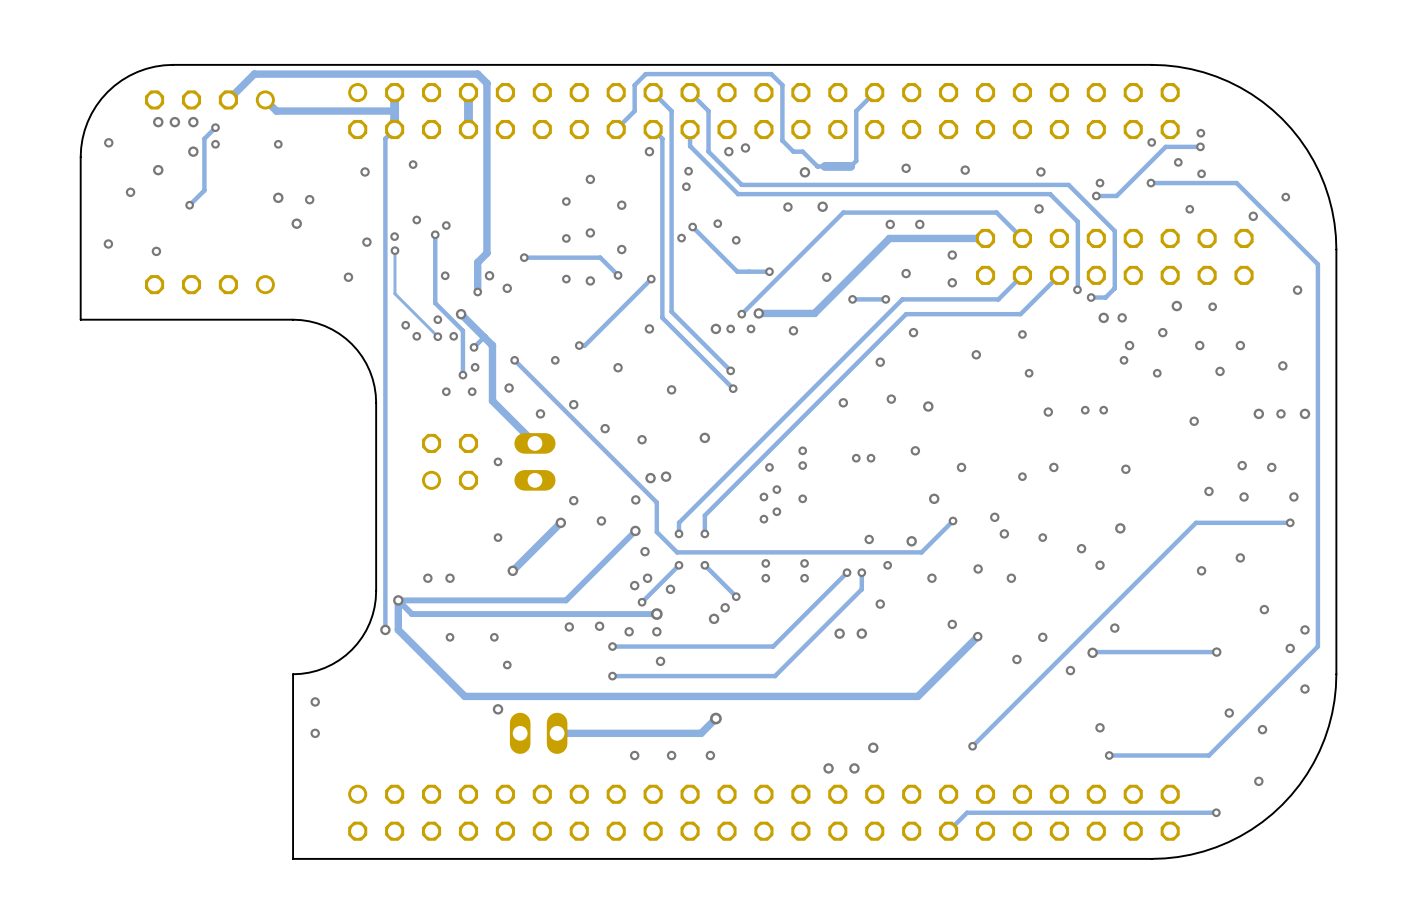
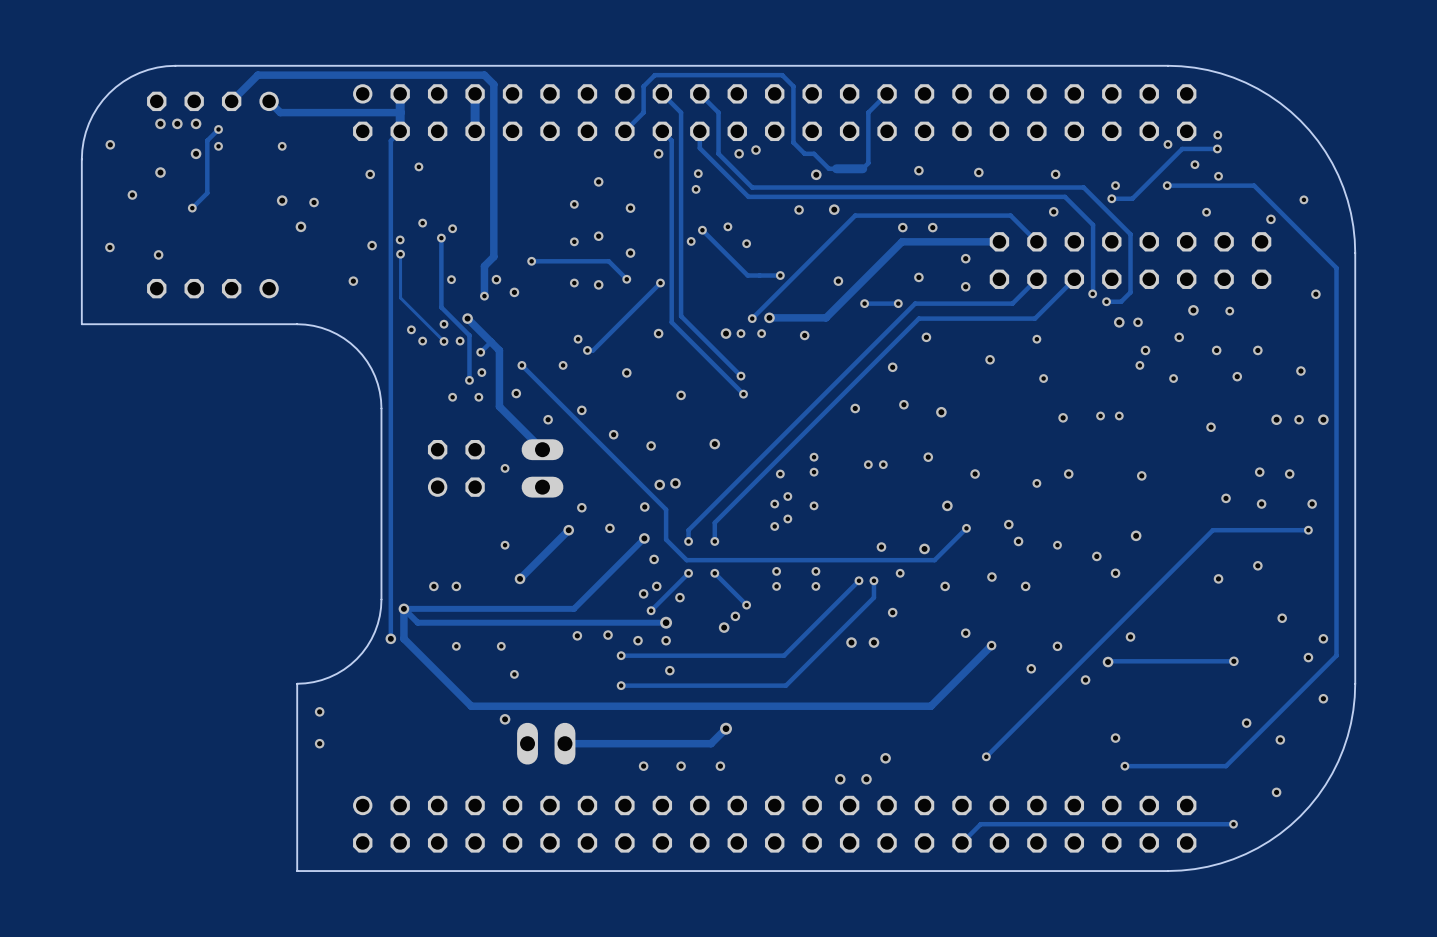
via: none -> (578, 339)

